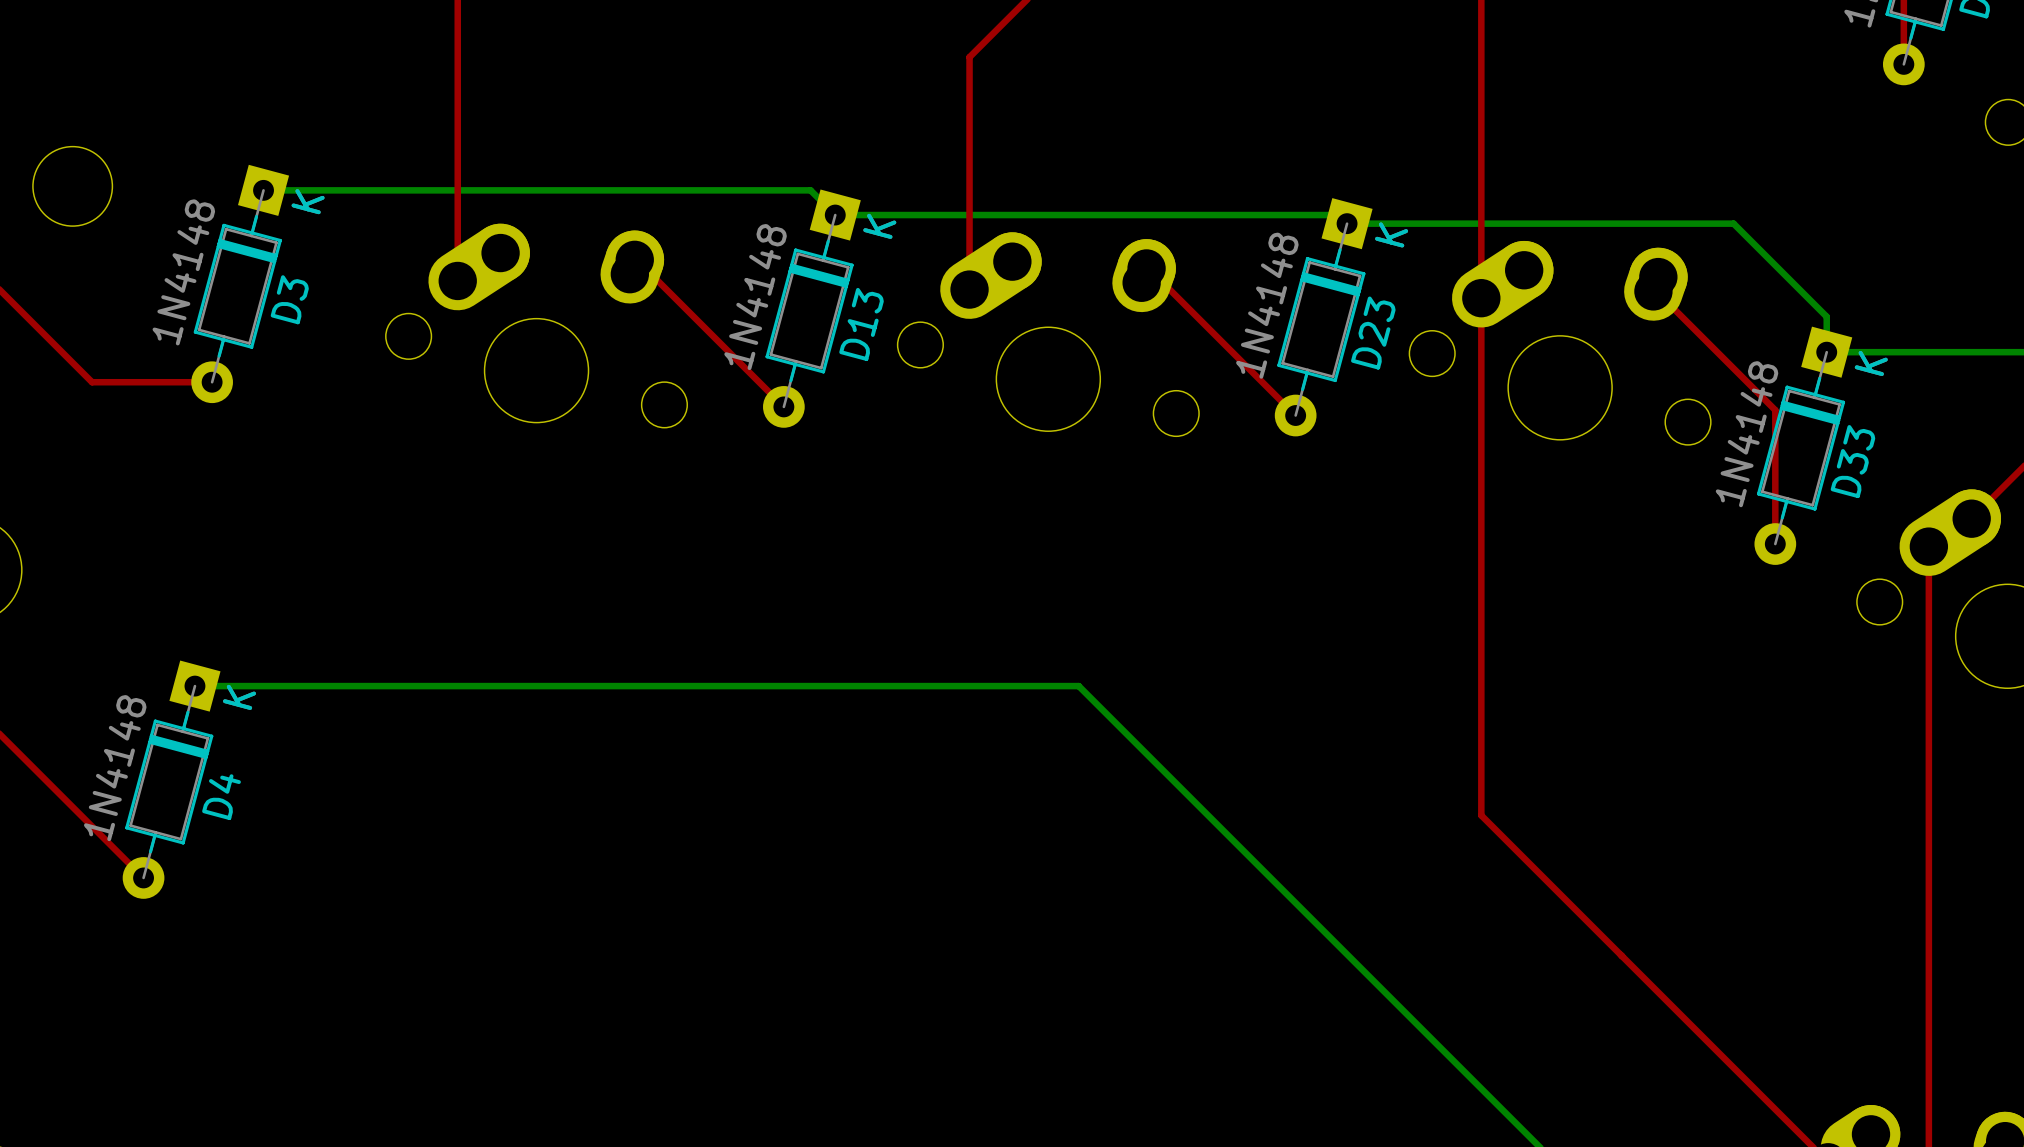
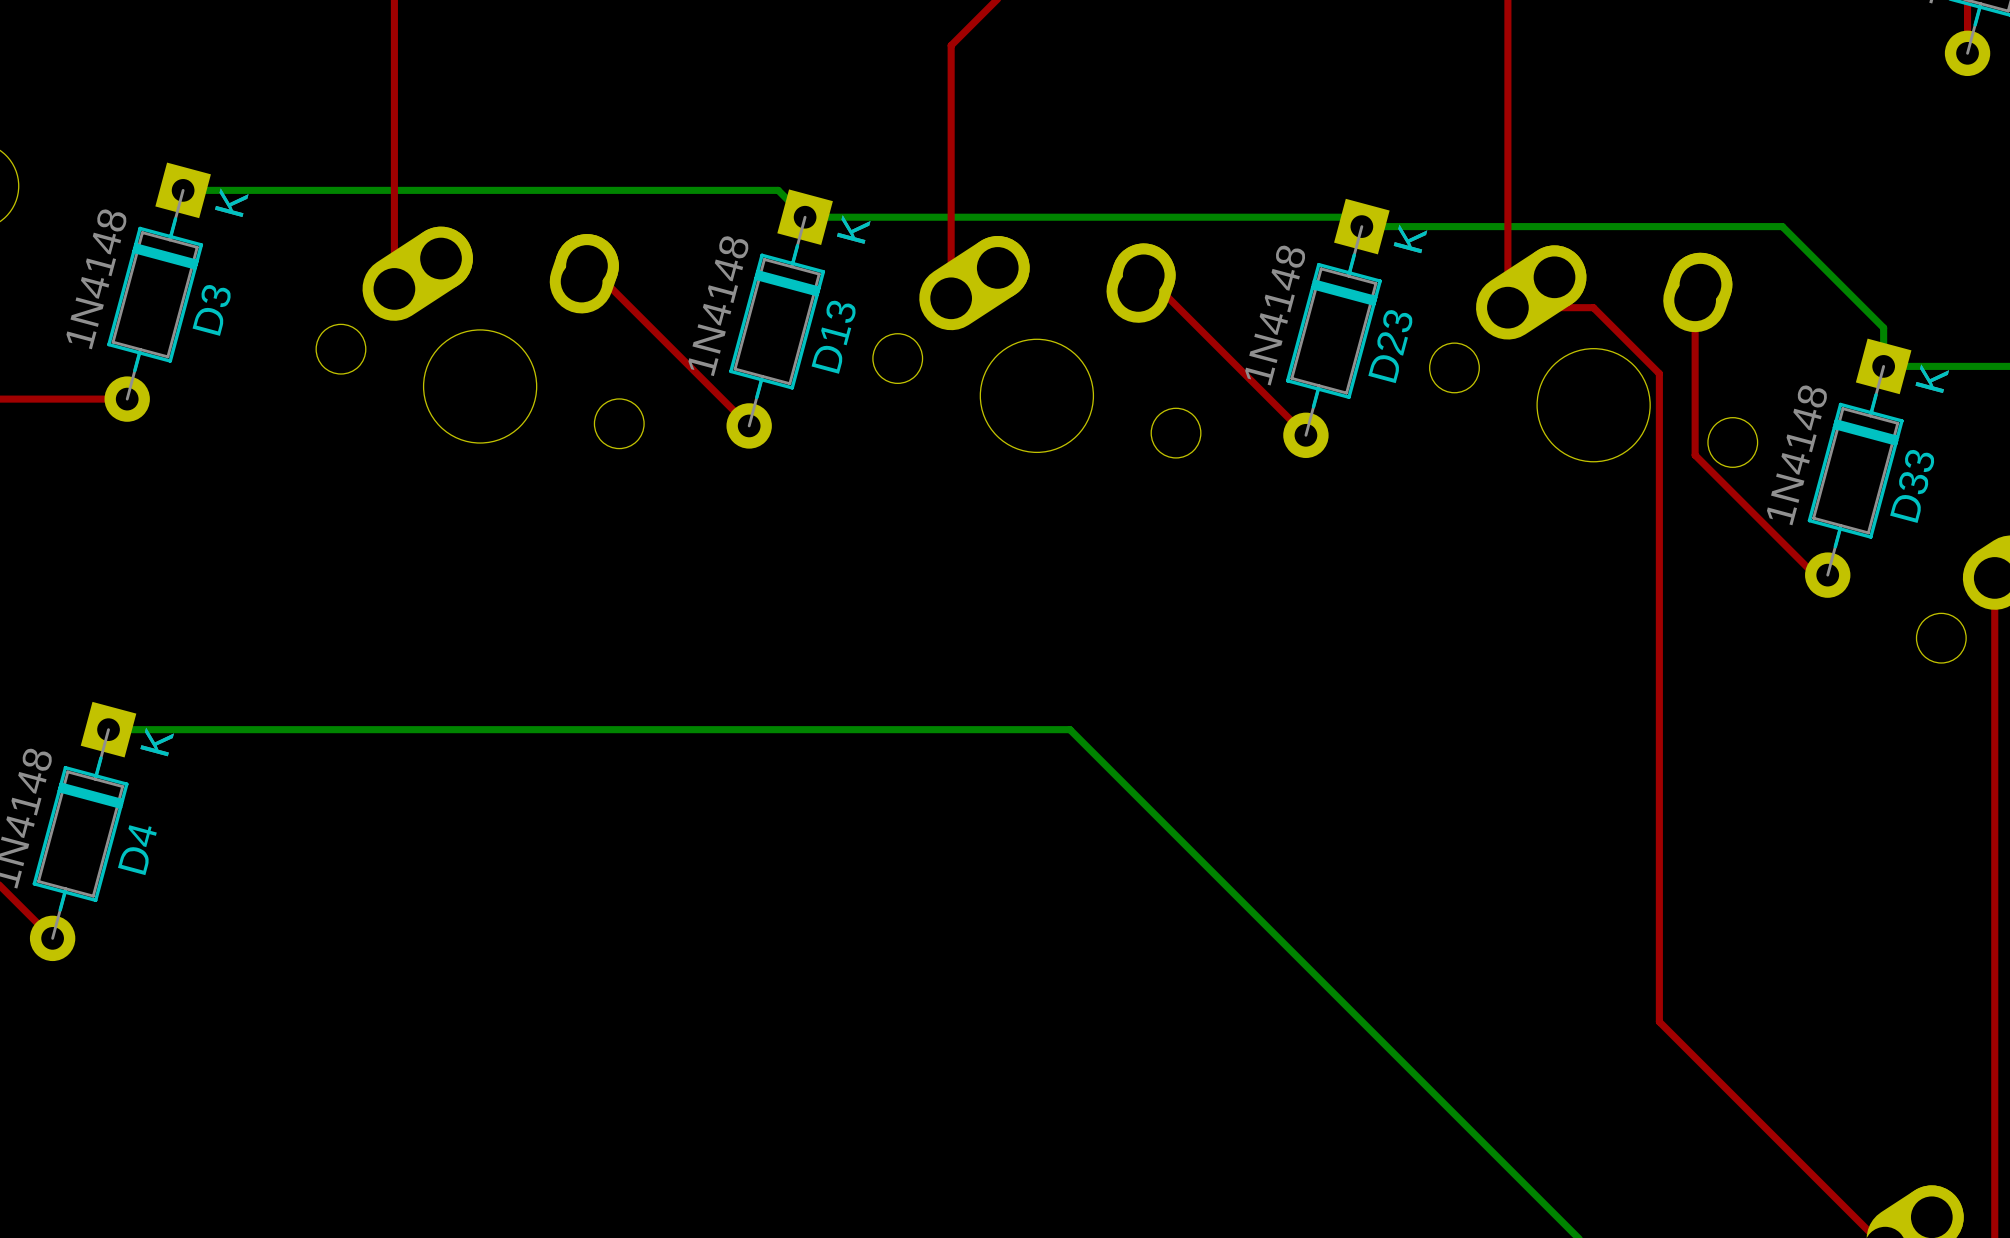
top track: (1653, 291) (1656, 291) (1775, 410) (1775, 544) -> (1695, 300) (1695, 455) (1815, 575)
top track: (1481, 298) (1481, 815) (1620, 954) -> (1507, 307) (1593, 307) (1659, 373) (1659, 1021)

